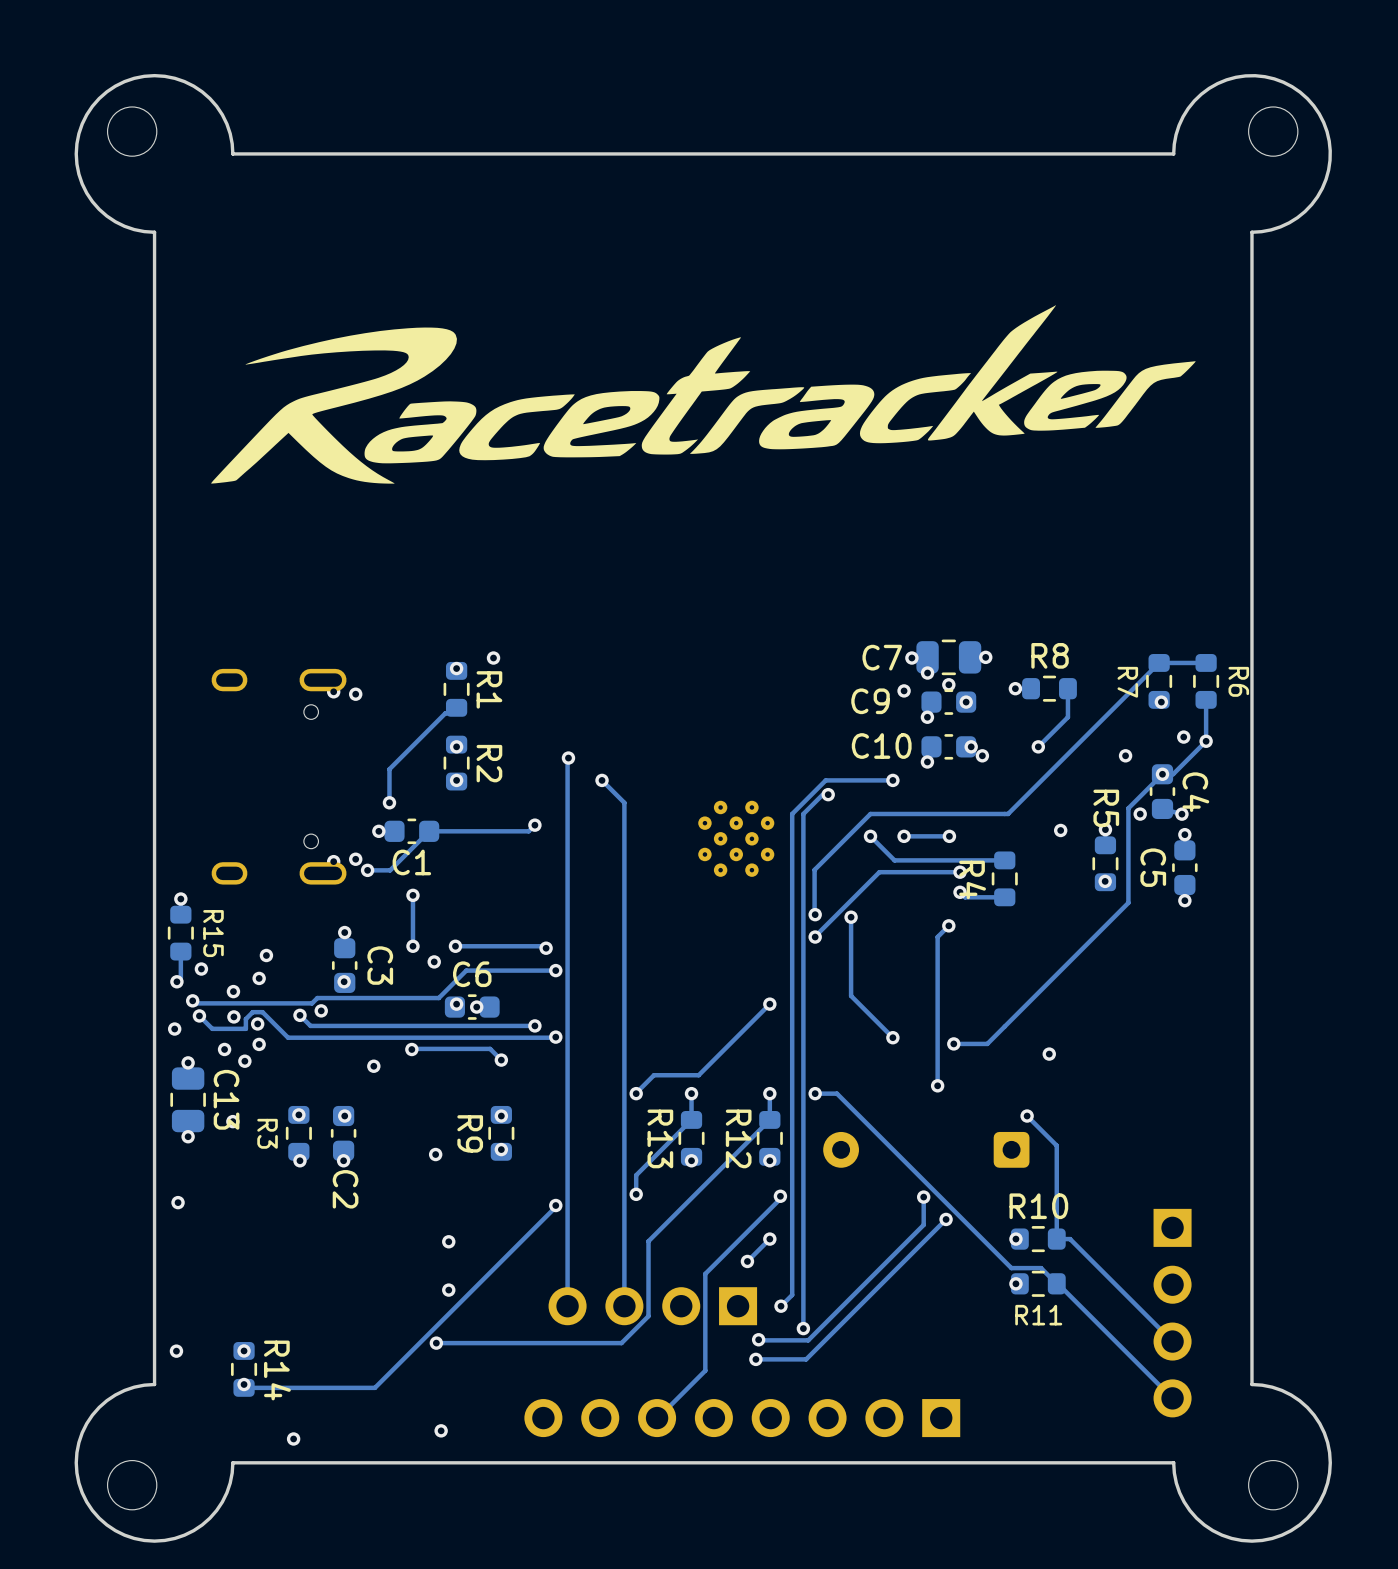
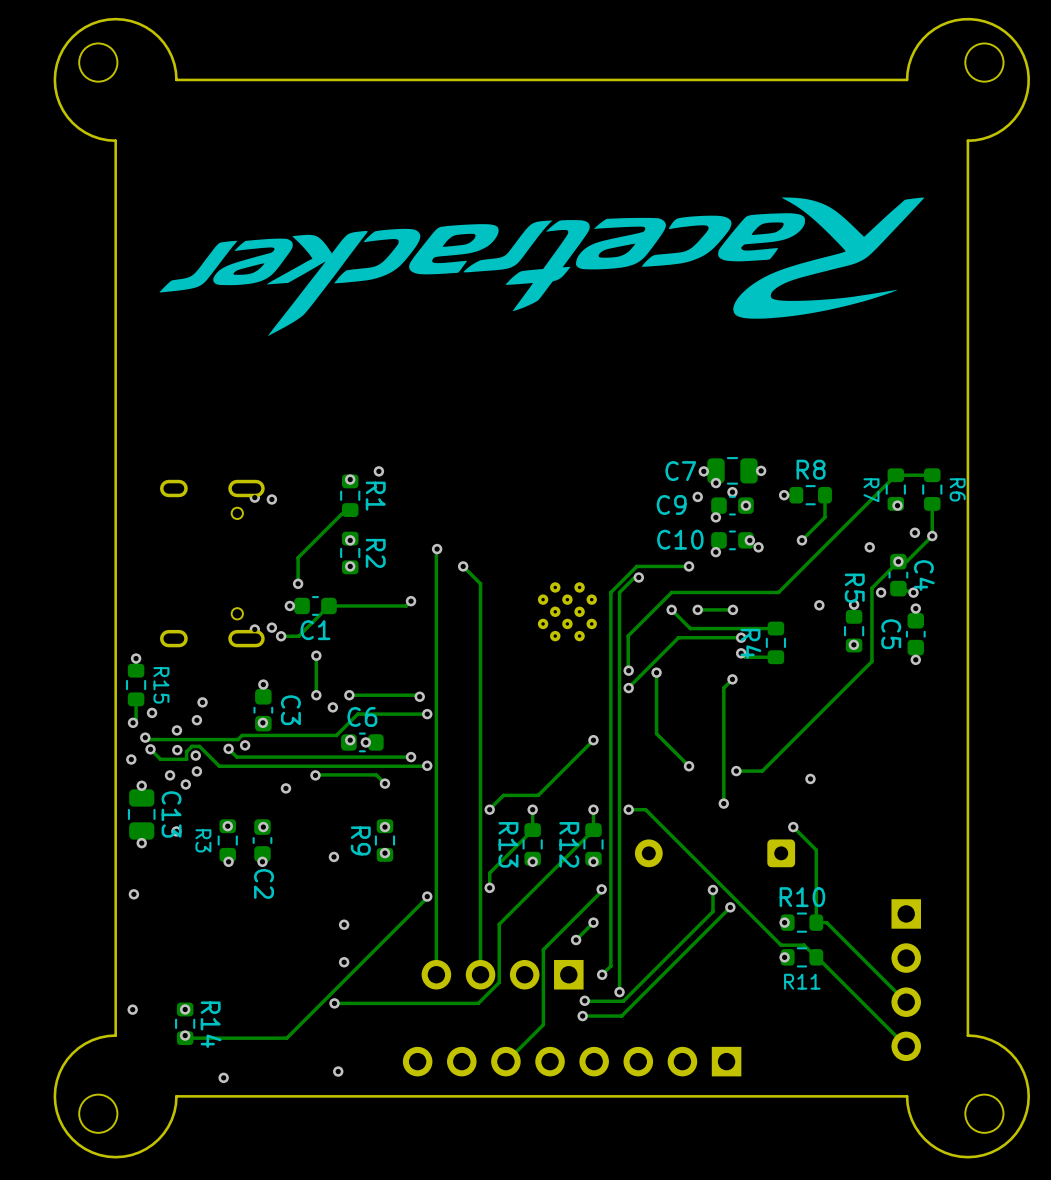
drawing shape: [927, 305, 1058, 441] -> [718, 213, 805, 262]
drawing shape: [211, 327, 457, 484] -> [213, 238, 293, 286]
drawing: none -> [576, 215, 732, 270]
drawing: none -> [333, 220, 553, 284]
drawing shape: [641, 337, 751, 455] -> [505, 220, 590, 312]
drawing: none -> [159, 240, 238, 293]
drawing: [1095, 361, 1196, 428] -> none
drawing shape: [1024, 370, 1127, 431] -> [733, 197, 925, 319]
drawing: [690, 373, 972, 454] -> none
drawing: [459, 391, 660, 461] -> none
drawing shape: [364, 401, 477, 464] -> [266, 230, 368, 336]

